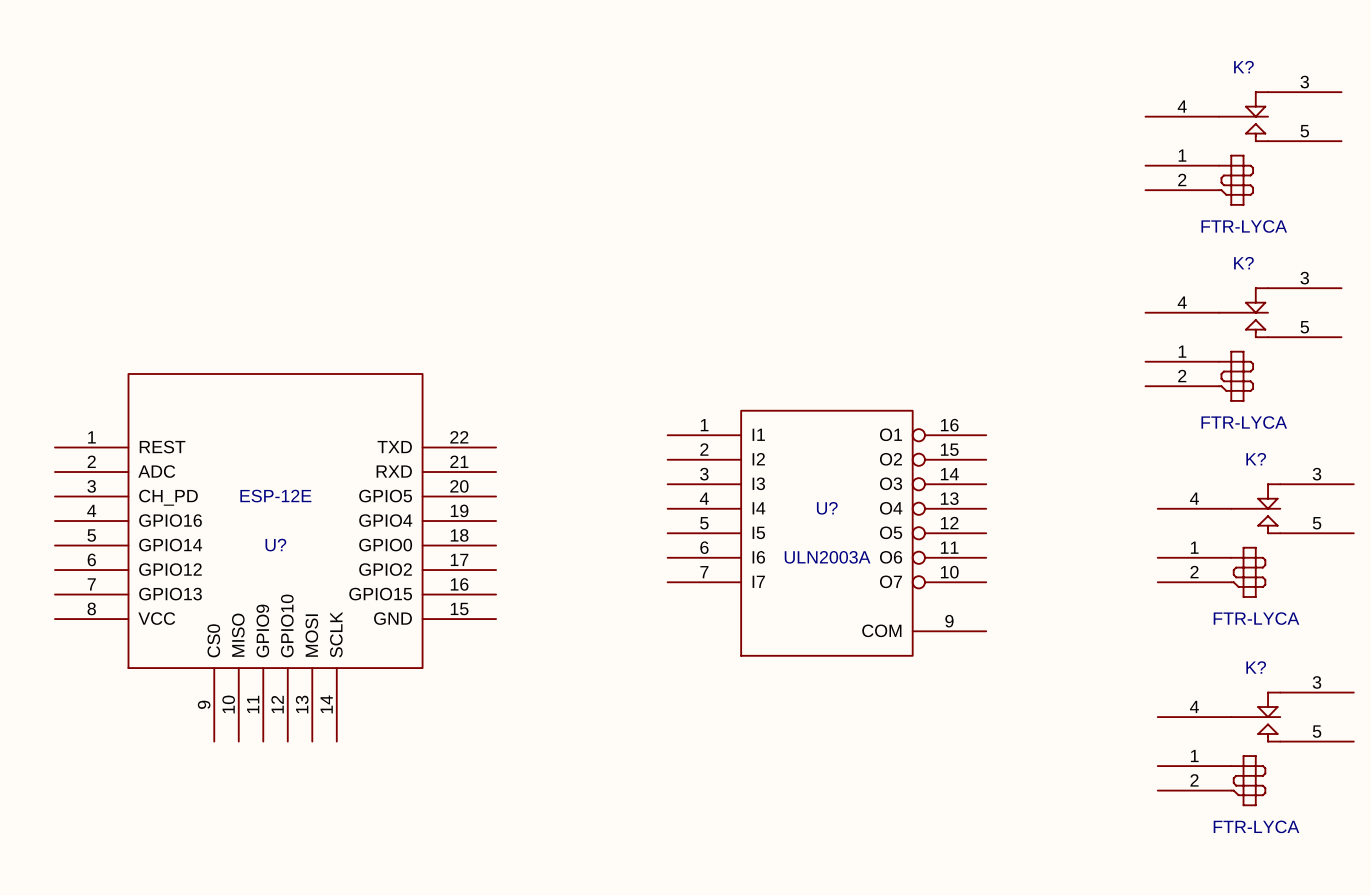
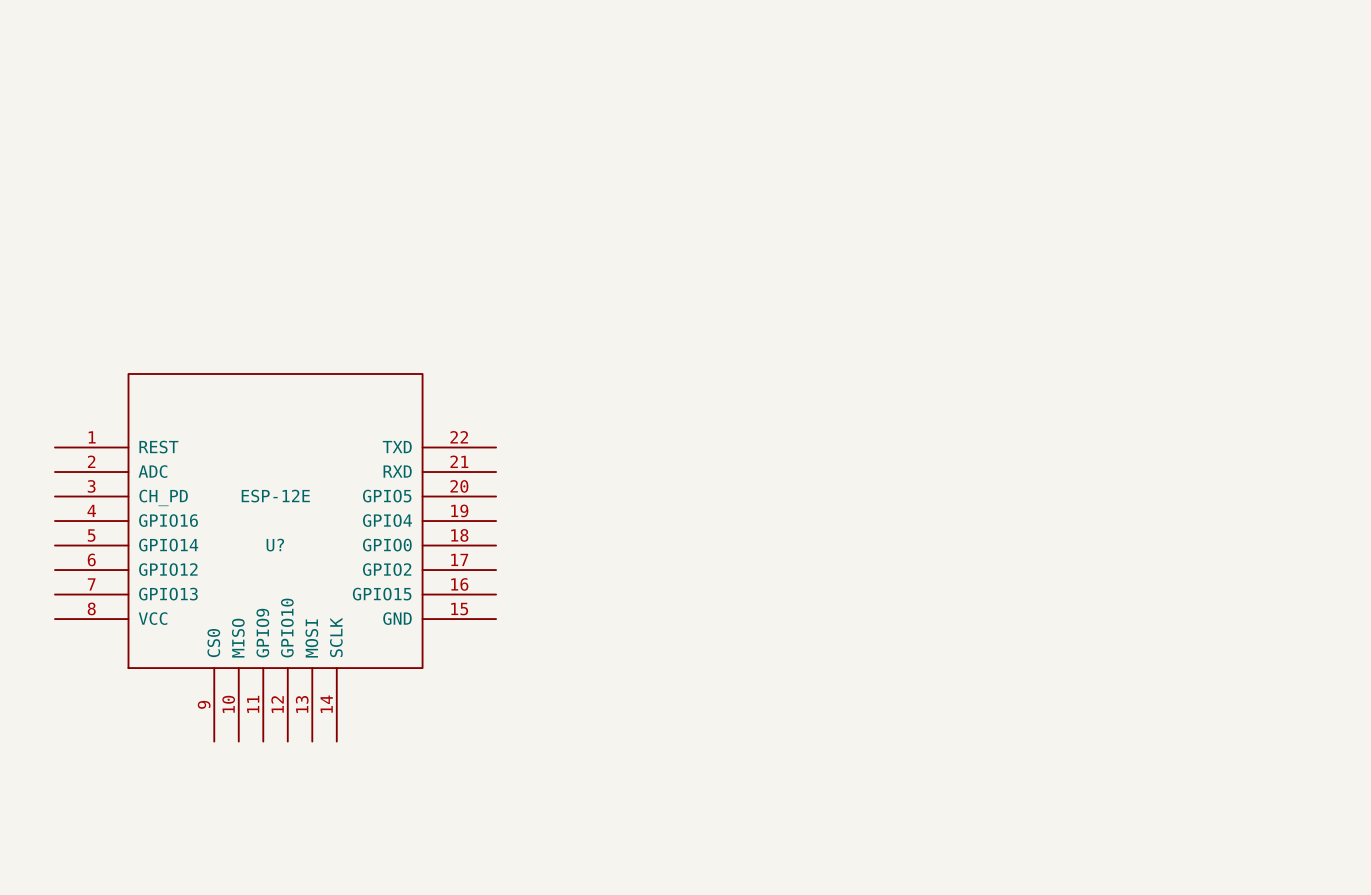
K?: FTR-LYCA (1243, 148) -> none
K?: FTR-LYCA (1243, 344) -> none
U?: ULN2003A (826, 533) -> none
K?: FTR-LYCA (1255, 540) -> none
K?: FTR-LYCA (1255, 748) -> none

